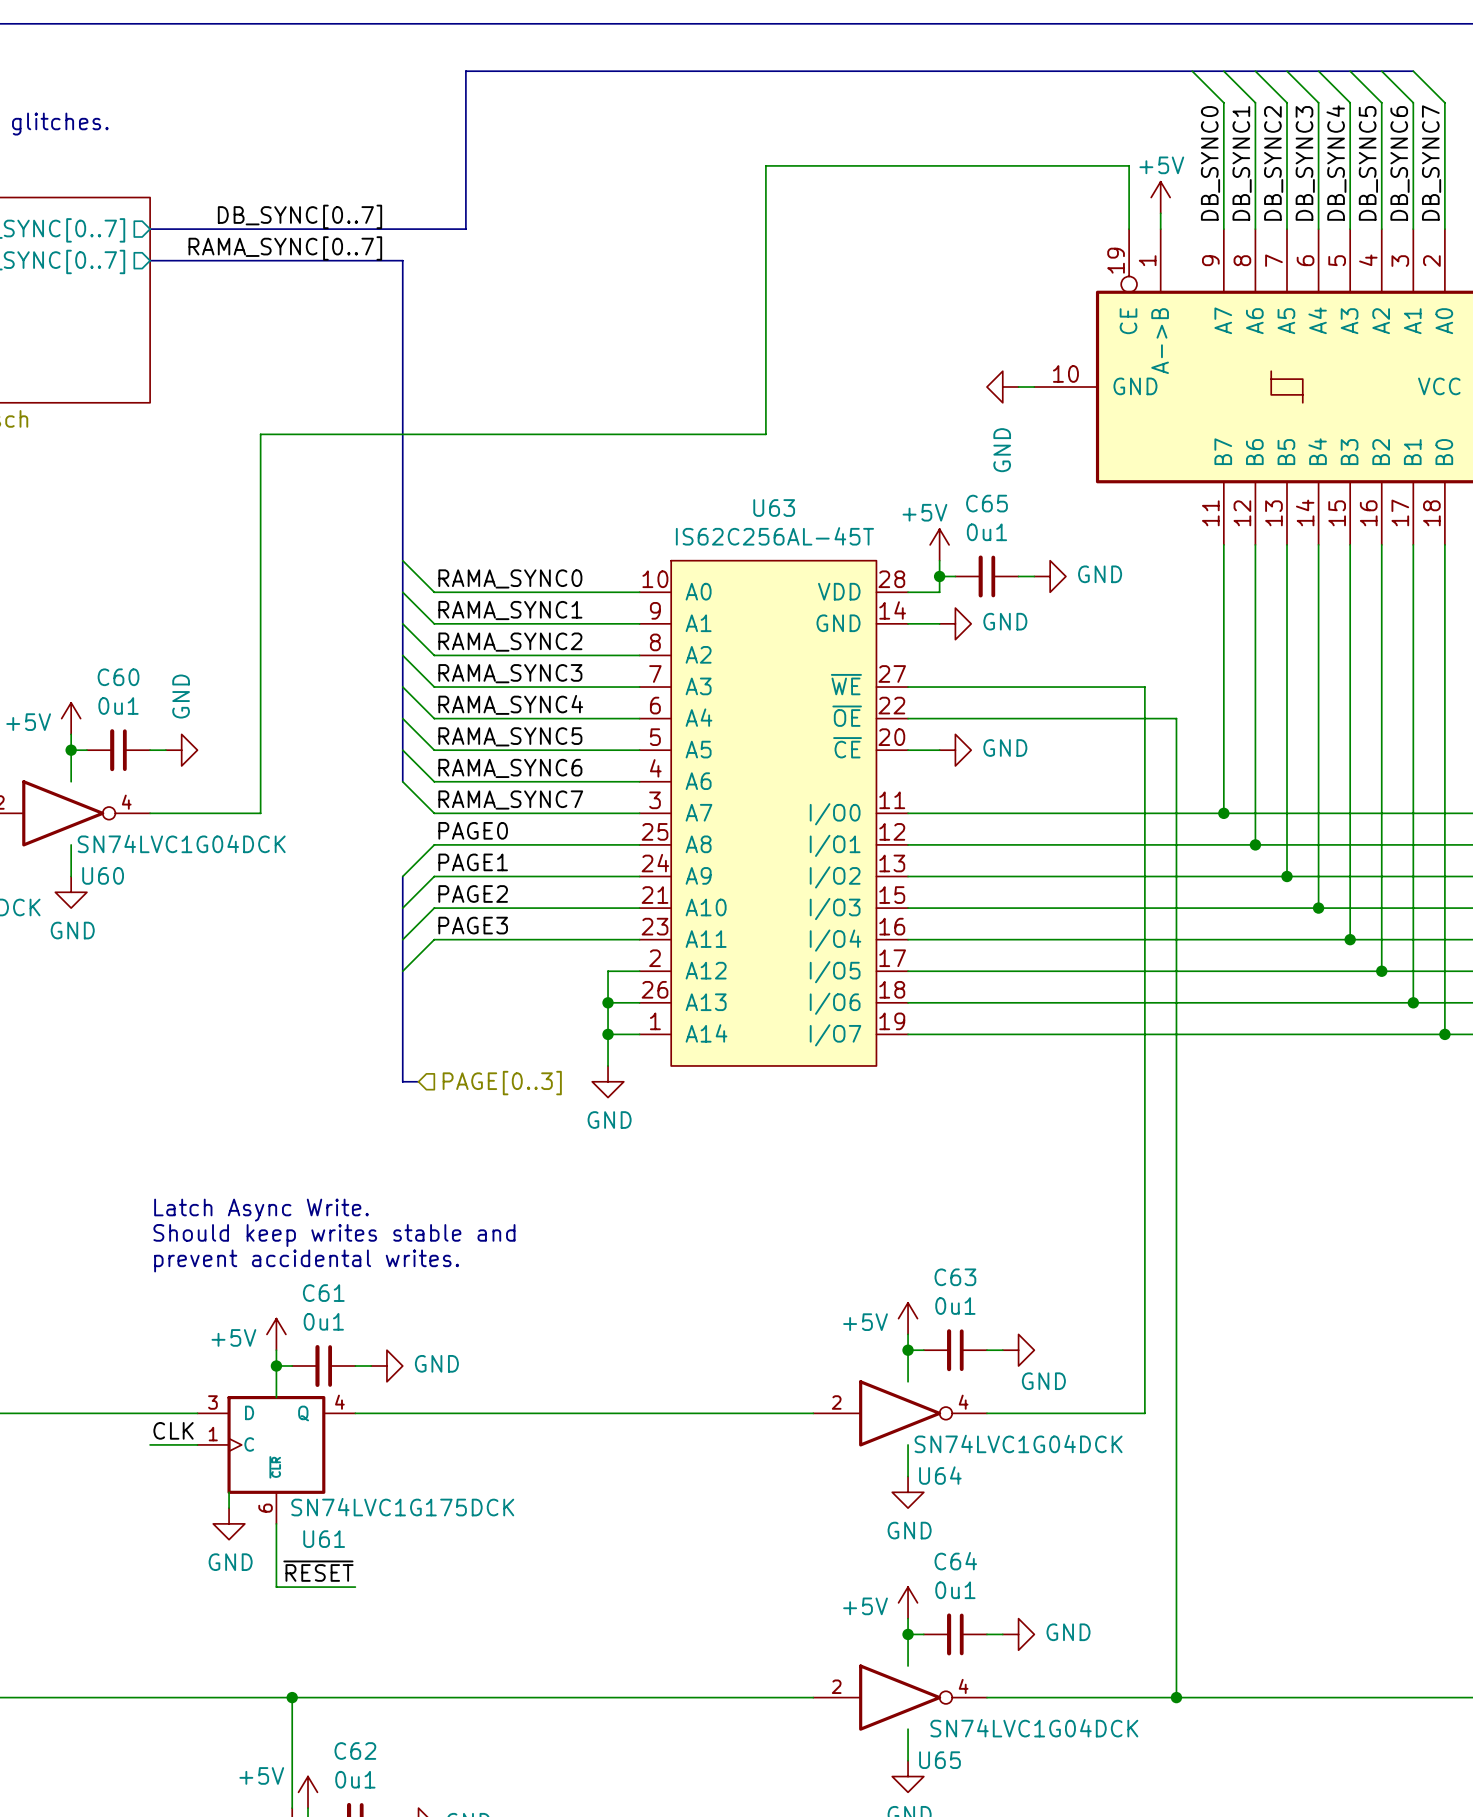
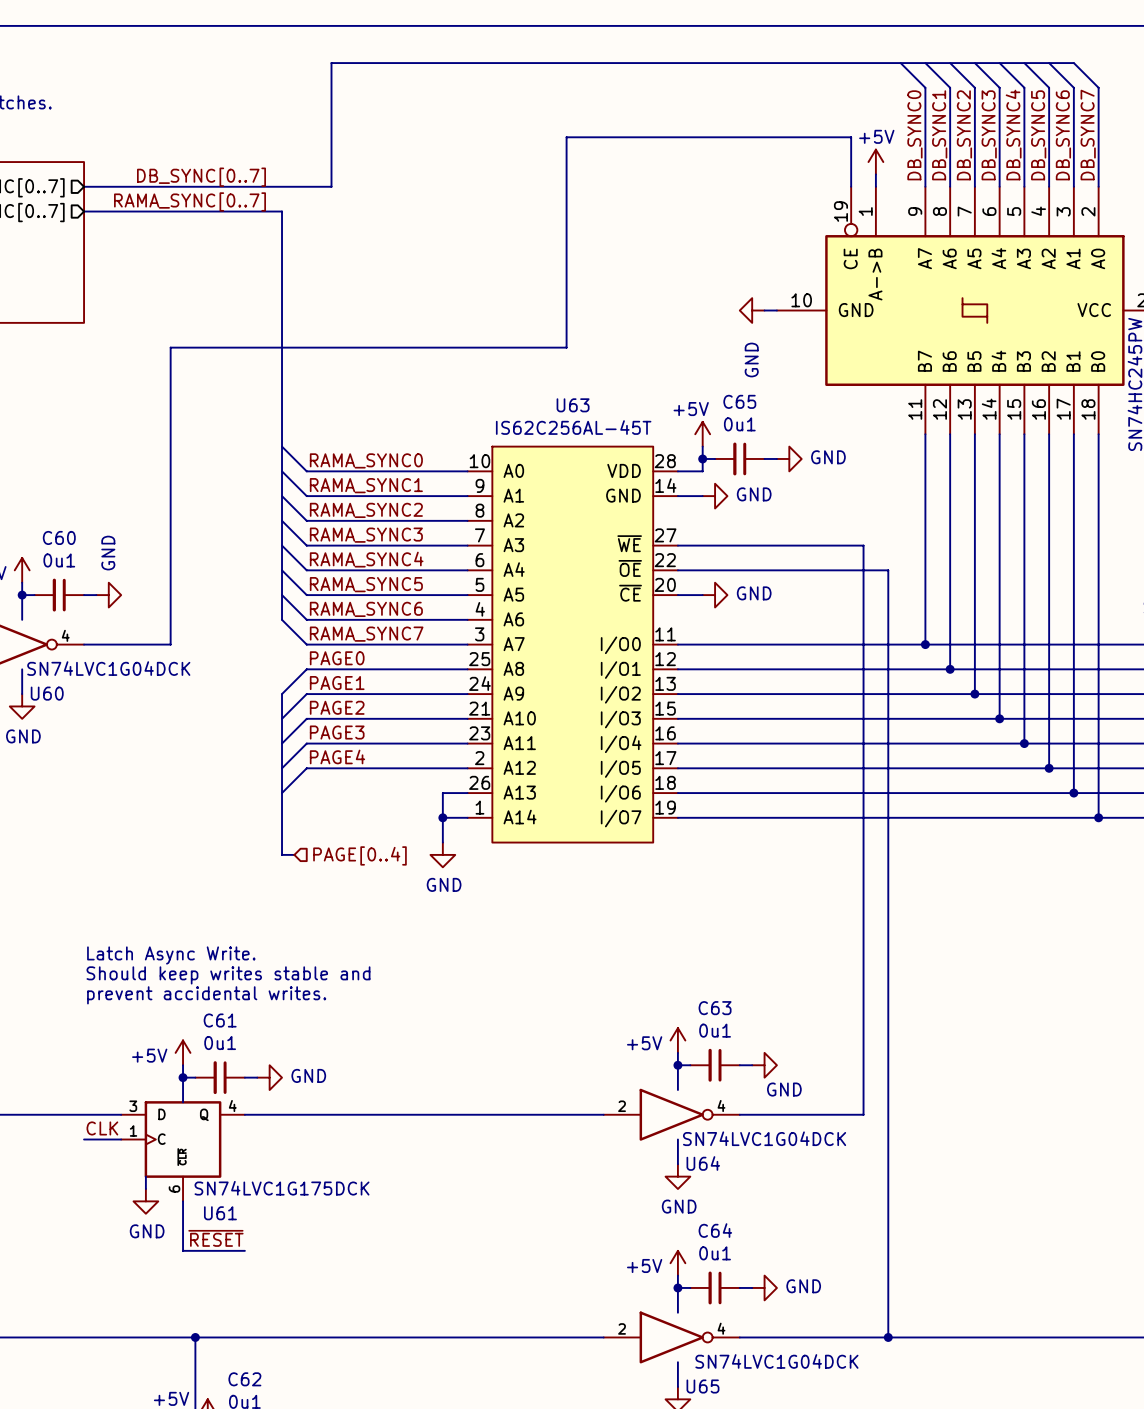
label: none -> PAGE4 (337, 756)
wire: (608, 971) (608, 1002) -> (442, 768) (306, 768) (282, 793)
junction: (608, 1002) -> none
hierarchical label: PAGE[0..3] (502, 1083) -> PAGE[0..4] (359, 855)

